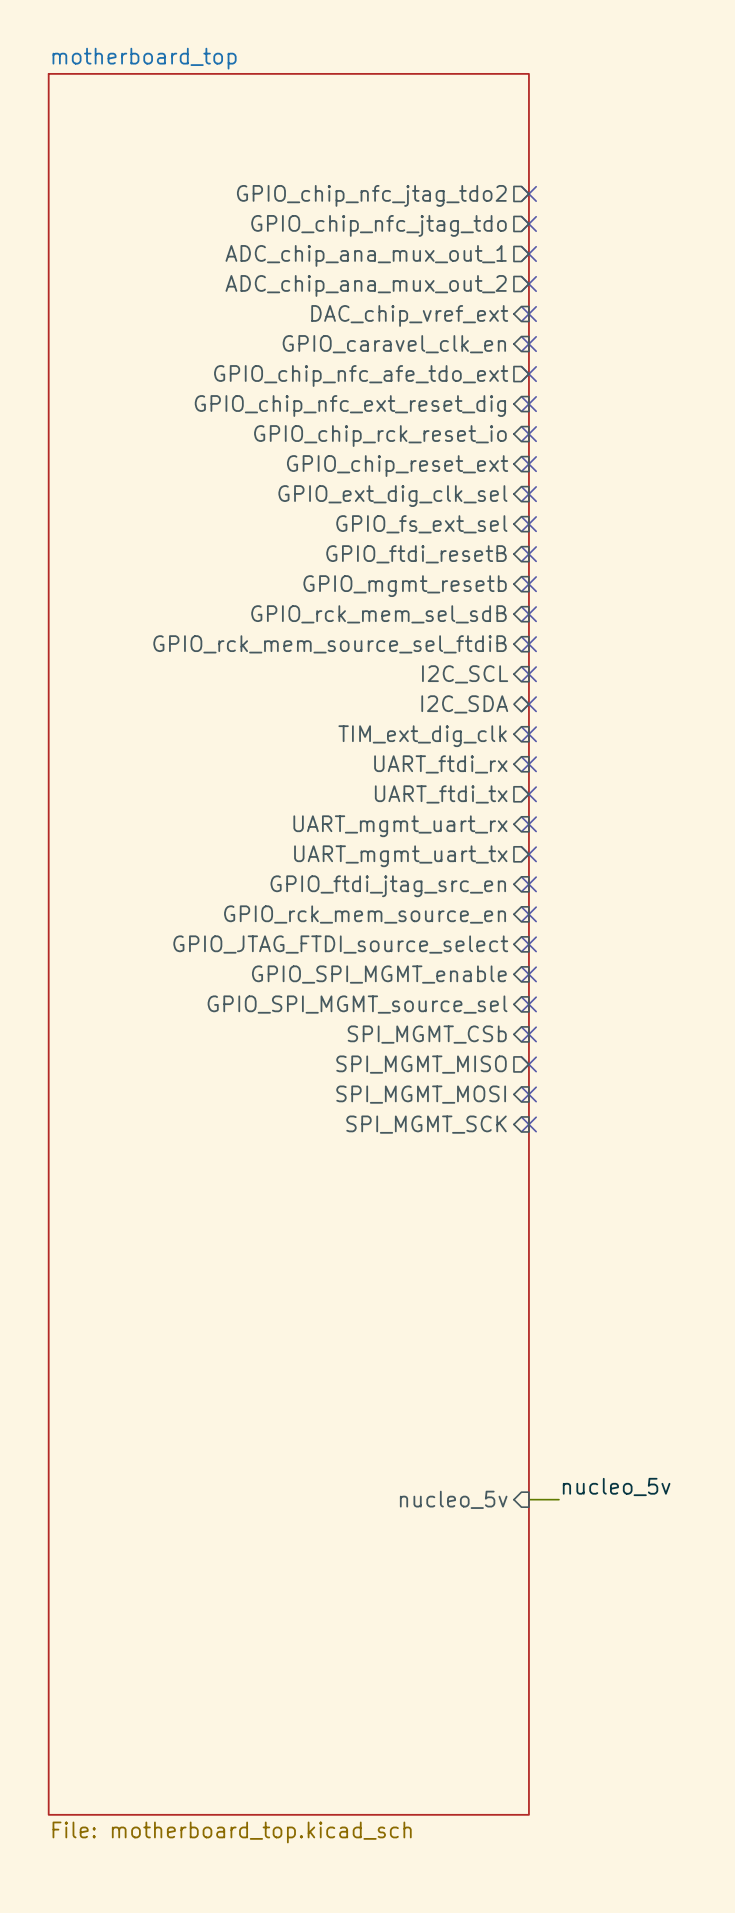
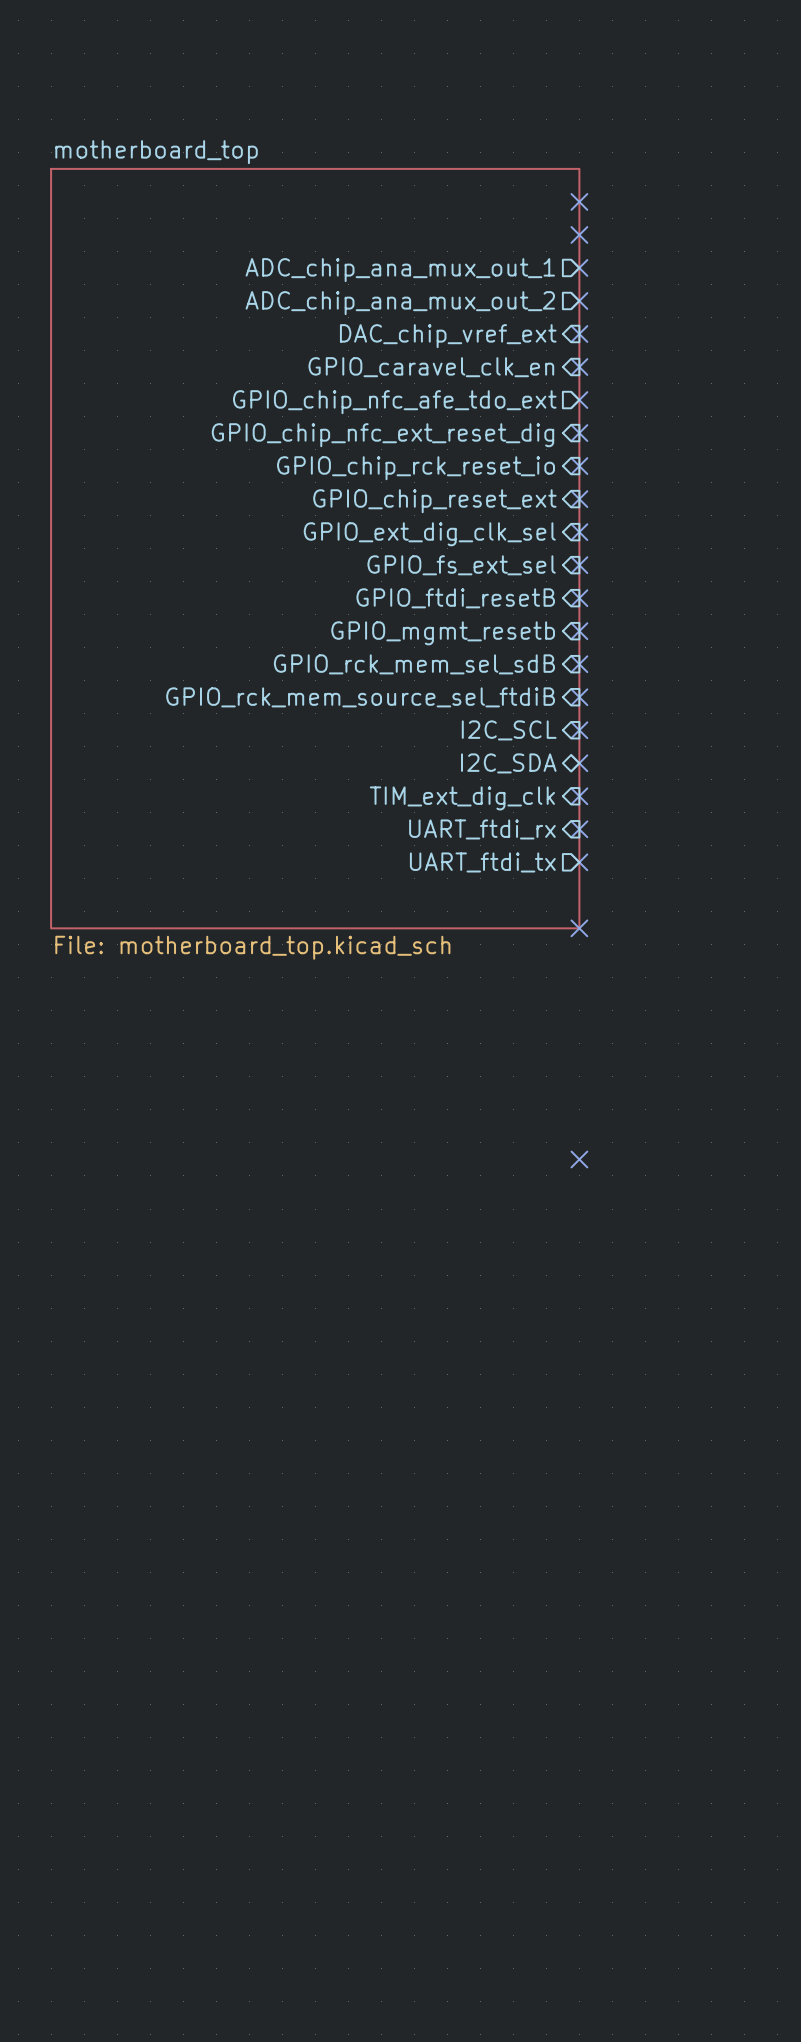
sheet pin: GPIO_chip_nfc_jtag_tdo2 (371, 195) -> none
sheet pin: GPIO_chip_nfc_jtag_tdo (378, 225) -> none
sheet motherboard_top: none -> File: motherboard_top.kicad_sch (315, 548)
no-connect mark: (528, 824) -> none
sheet pin: UART_mgmt_uart_rx (400, 826) -> none
sheet pin: UART_mgmt_uart_tx (400, 856) -> none
no-connect mark: (528, 884) -> none
sheet pin: GPIO_ftdi_jtag_src_en (388, 886) -> none
sheet pin: GPIO_rck_mem_source_en (365, 914) -> none
no-connect mark: (528, 914) -> none
sheet motherboard_top: File: motherboard_top.kicad_sch (288, 944) -> none
sheet pin: GPIO_JTAG_FTDI_source_select (340, 944) -> none
no-connect mark: (528, 944) -> none
sheet pin: GPIO_SPI_MGMT_enable (379, 974) -> none
no-connect mark: (528, 974) -> none
sheet pin: GPIO_SPI_MGMT_source_sel (357, 1004) -> none
no-connect mark: (528, 1004) -> none
sheet pin: SPI_MGMT_CSb (427, 1034) -> none
no-connect mark: (528, 1034) -> none
sheet pin: SPI_MGMT_MISO (421, 1064) -> none
sheet pin: SPI_MGMT_MOSI (421, 1094) -> none
no-connect mark: (528, 1094) -> none
sheet pin: SPI_MGMT_SCK (426, 1124) -> none
no-connect mark: (528, 1124) -> none
label: nucleo_5v (616, 1486) -> none
sheet pin: nucleo_5v (453, 1499) -> none
wire: (528, 1499) (558, 1499) -> none

